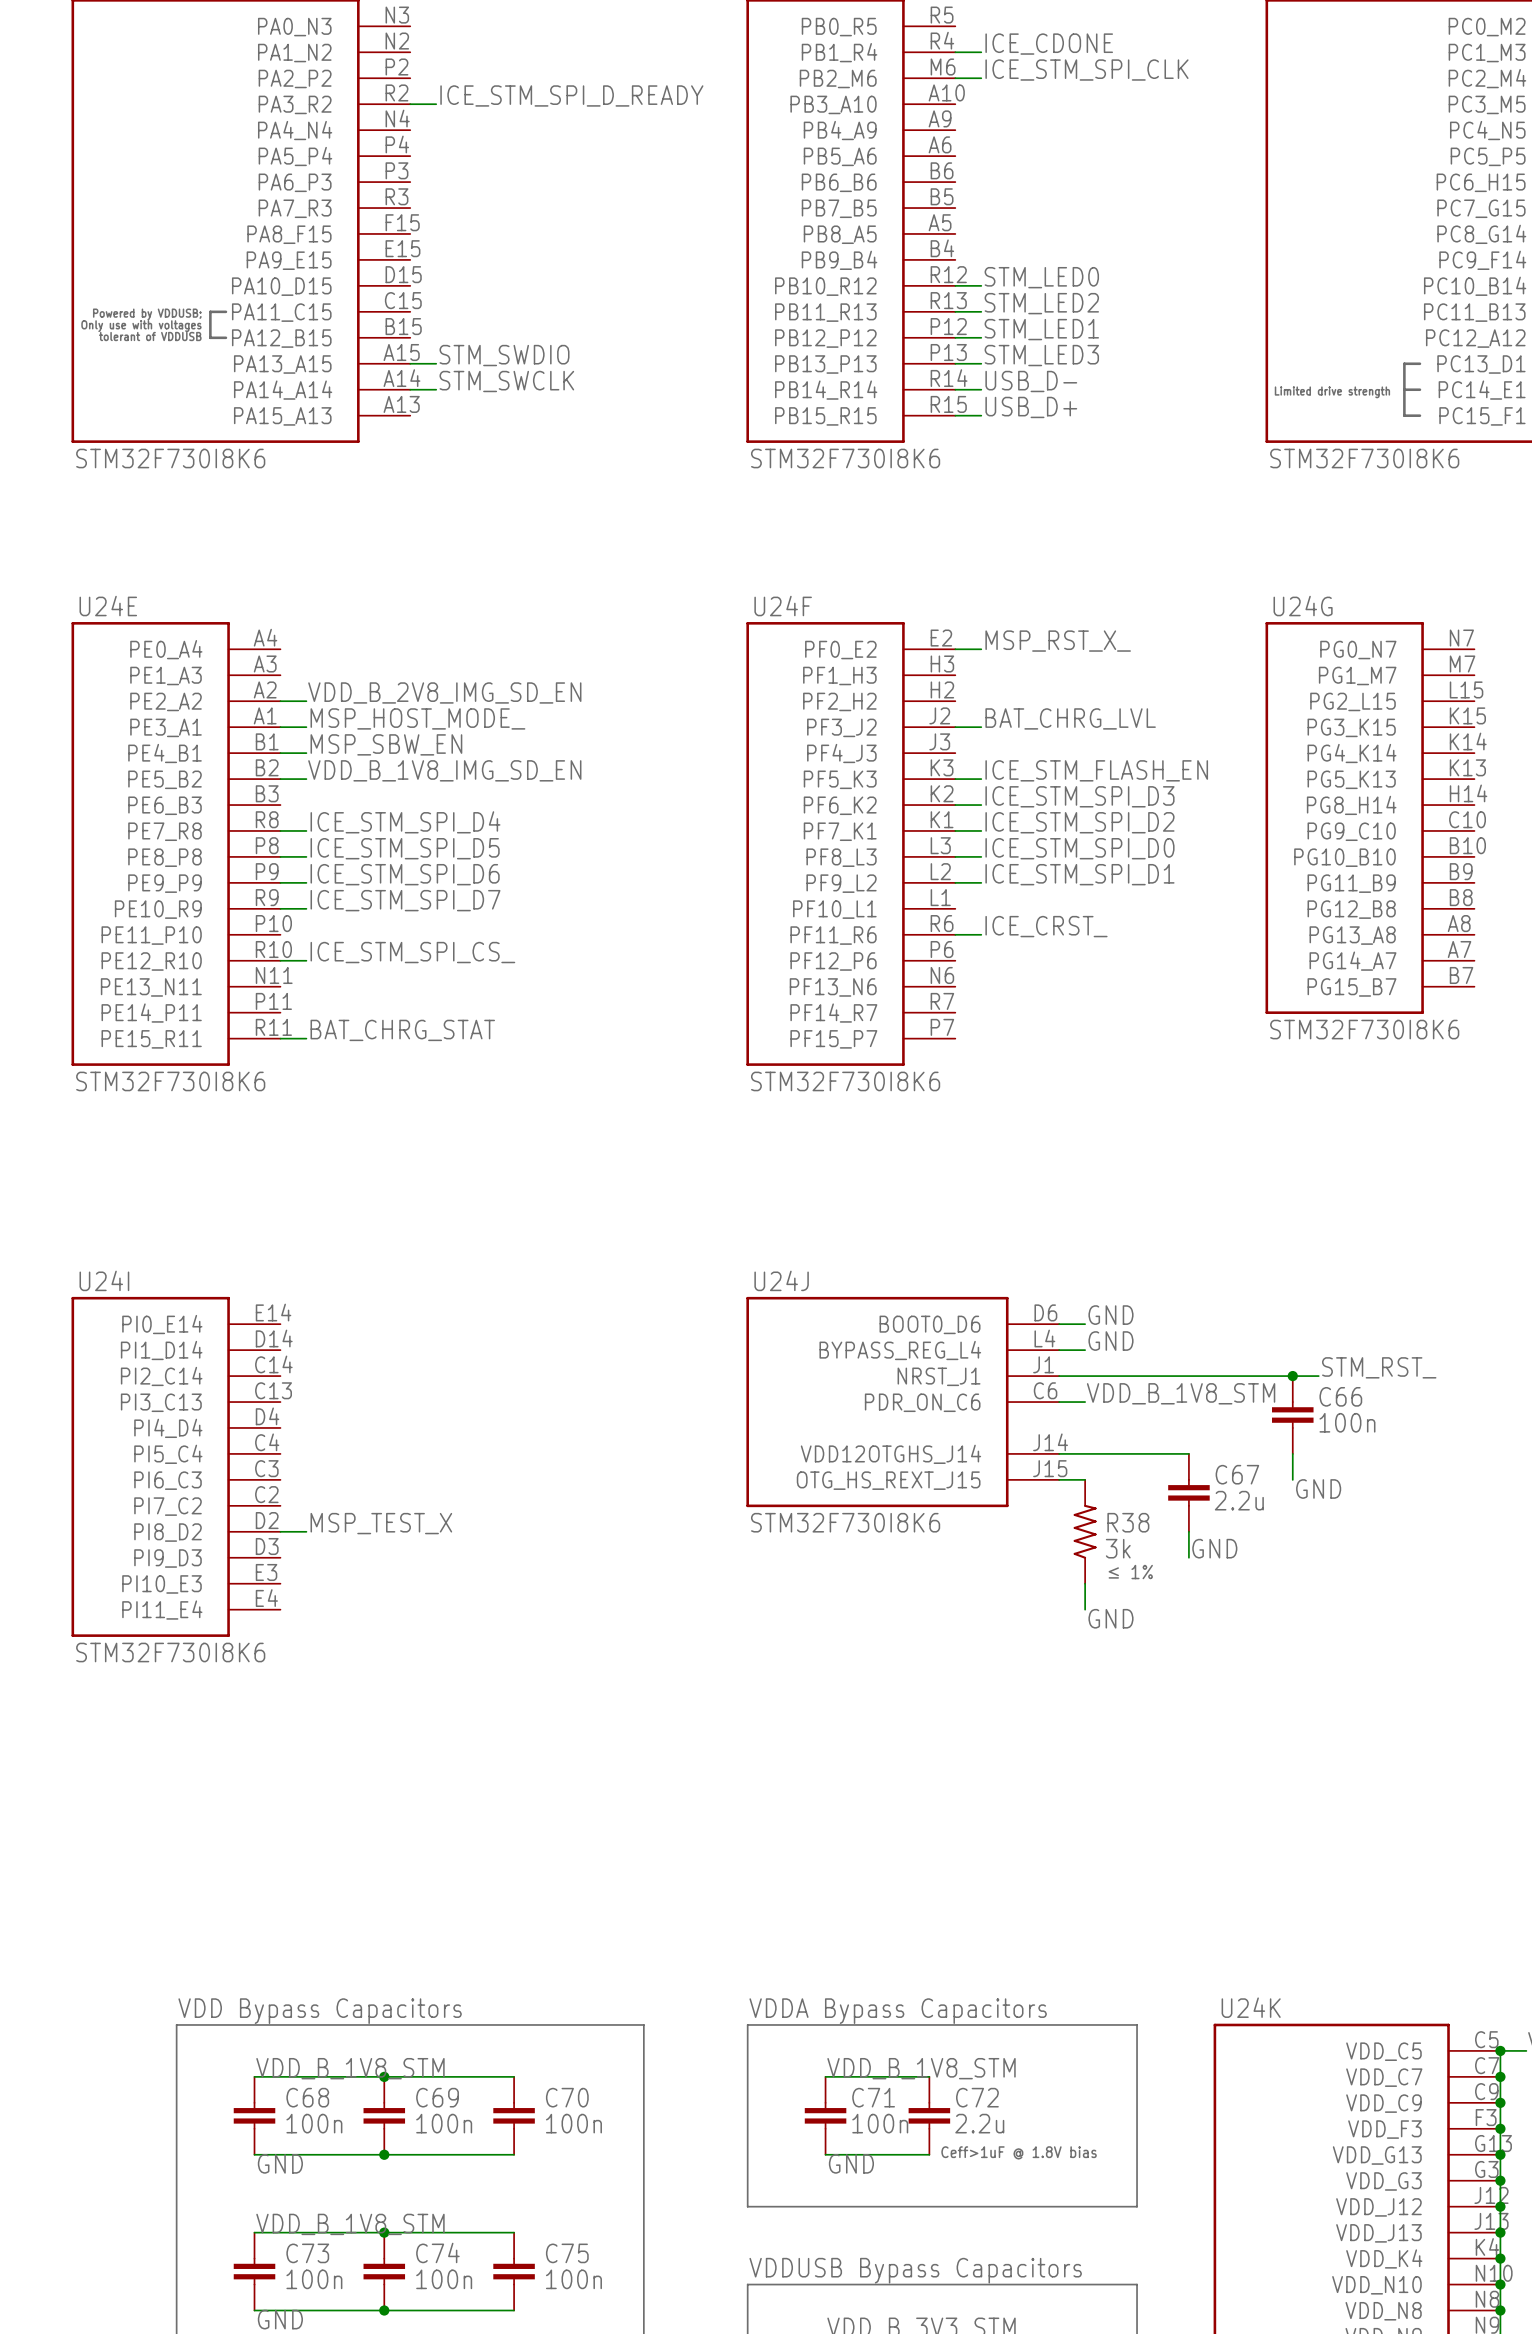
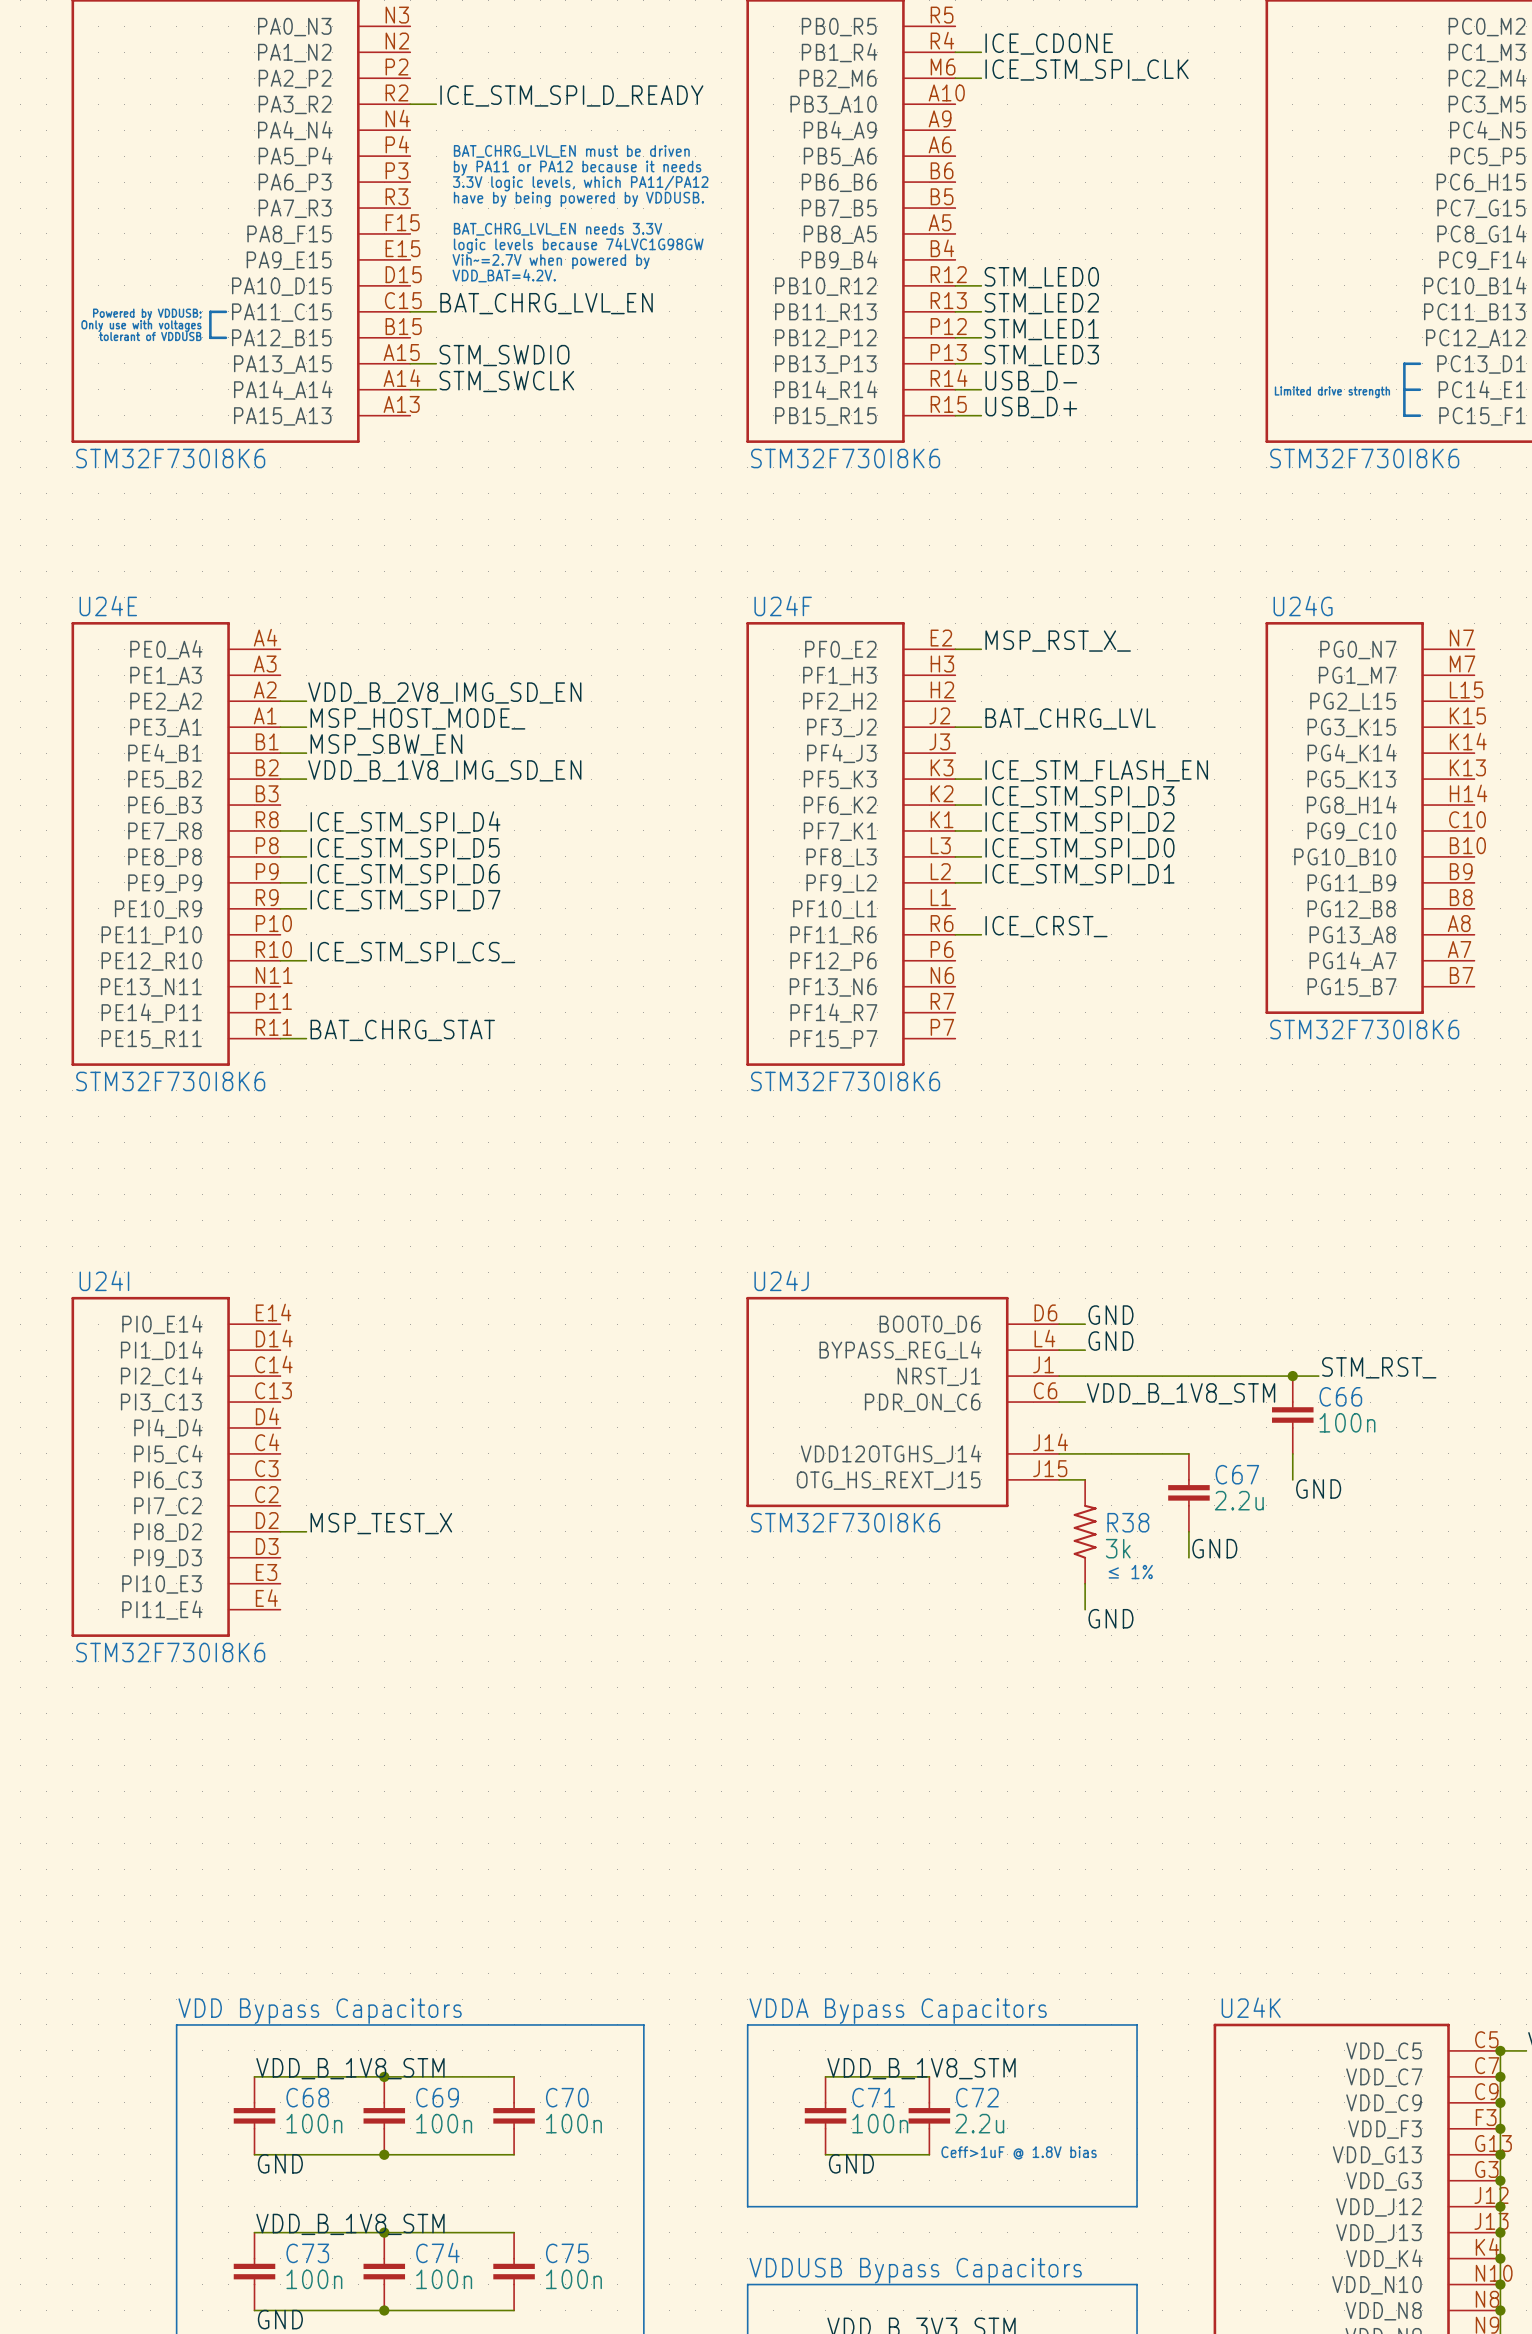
text: none -> BAT_CHRG_LVL_EN must be driven (571, 151)
text: none -> by PA11 or PA12 because it needs (577, 168)
text: none -> 3.3V logic levels, which PA11/PA12 (580, 183)
text: none -> have by being powered by VDDUSB. (578, 199)
text: none -> BAT_CHRG_LVL_EN needs 3.3V (558, 229)
text: none -> logic levels because 74LVC1G98GW (578, 245)
text: none -> Vih~=2.7V when powered by (551, 261)
text: none -> VDD_BAT=4.2V. (504, 275)
label: none -> BAT_CHRG_LVL_EN (546, 303)
wire: none -> (410, 311) (436, 311)

